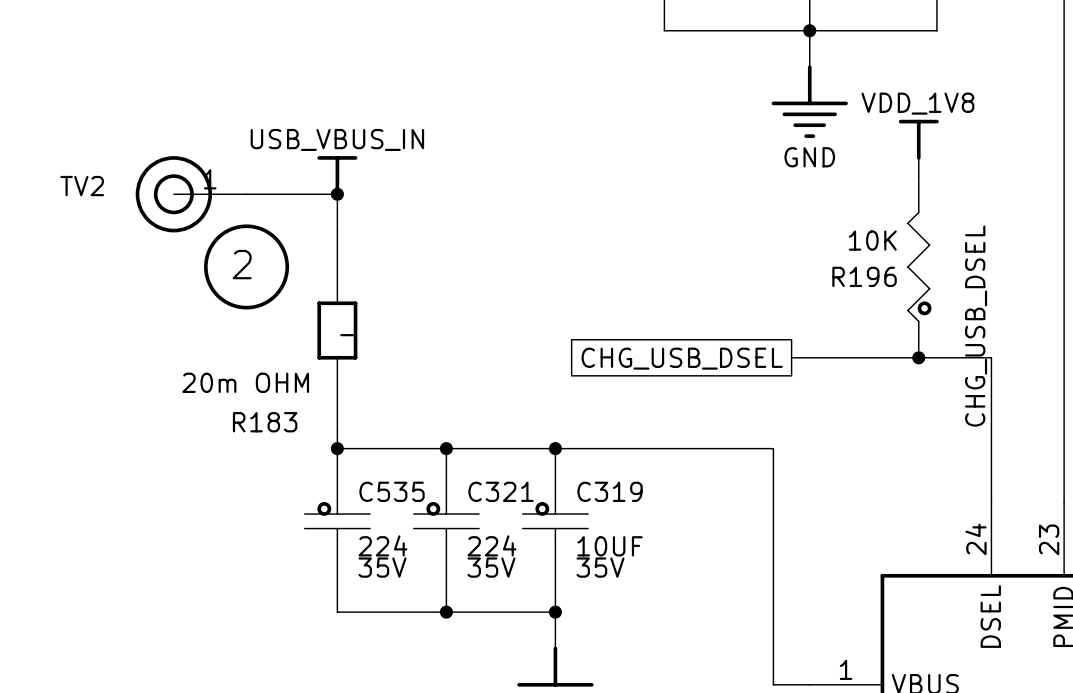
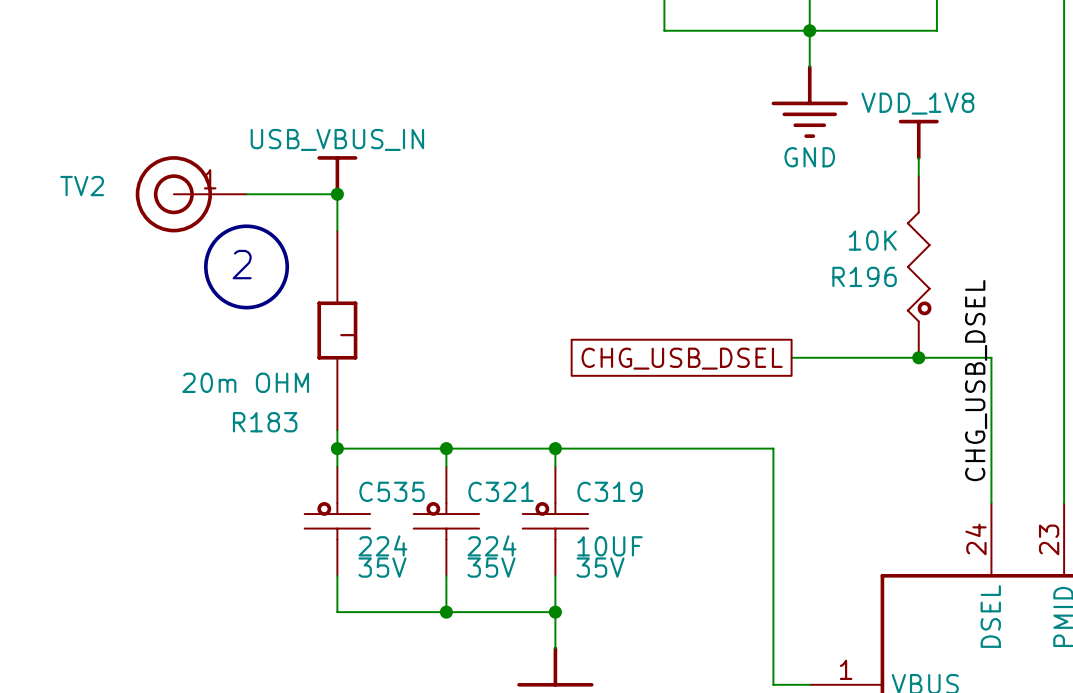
label position: CHG_USB_DSEL (976, 326) -> CHG_USB_DSEL (976, 380)

